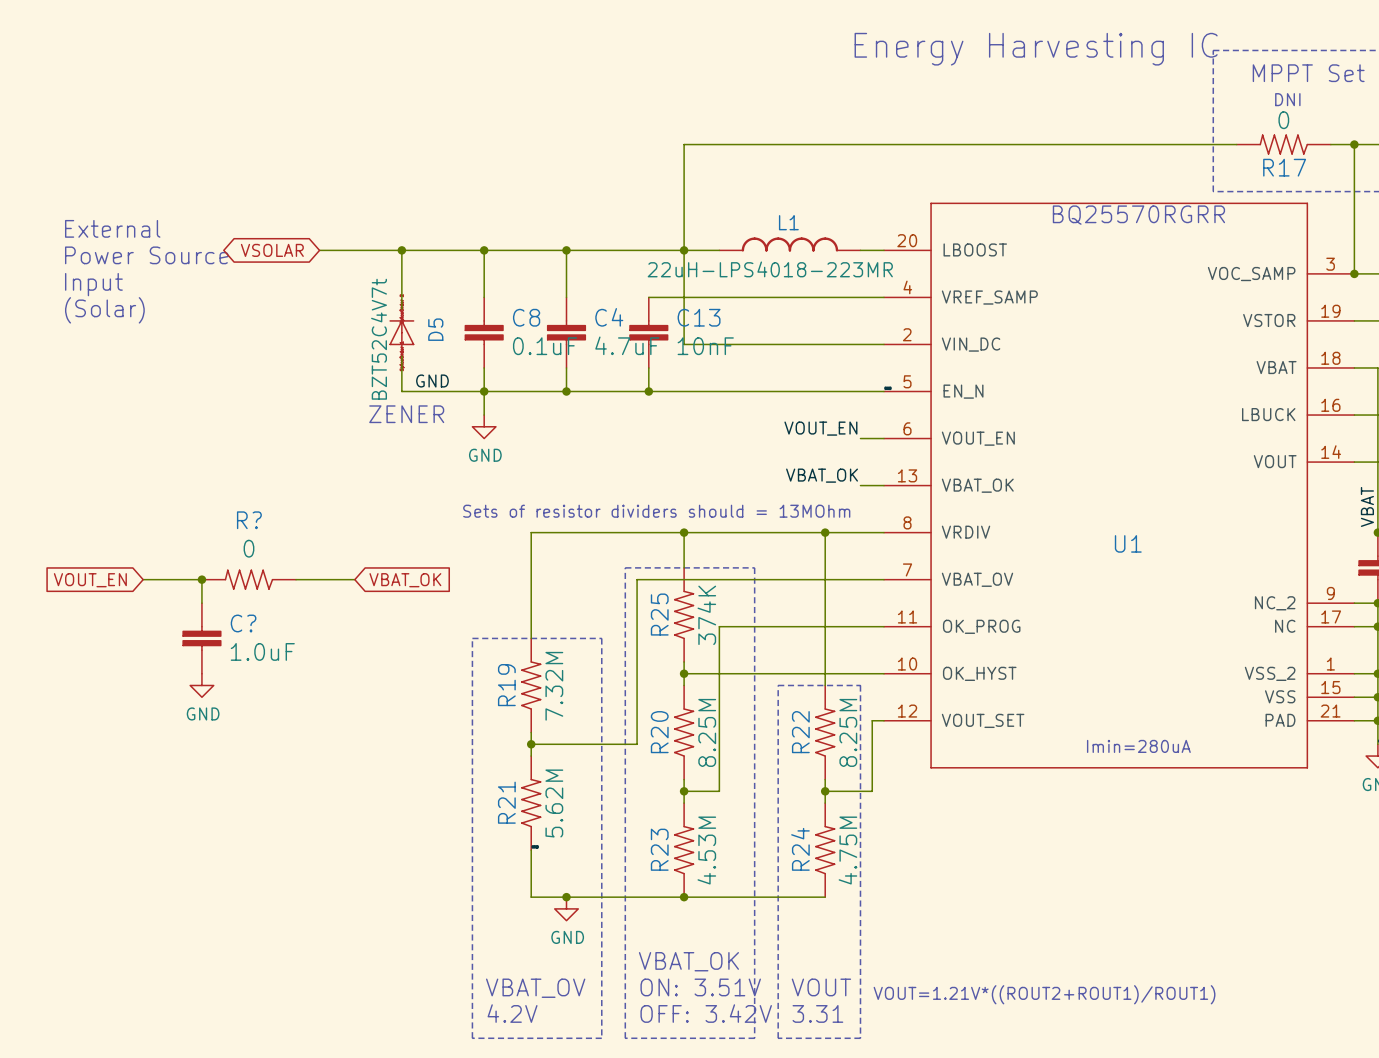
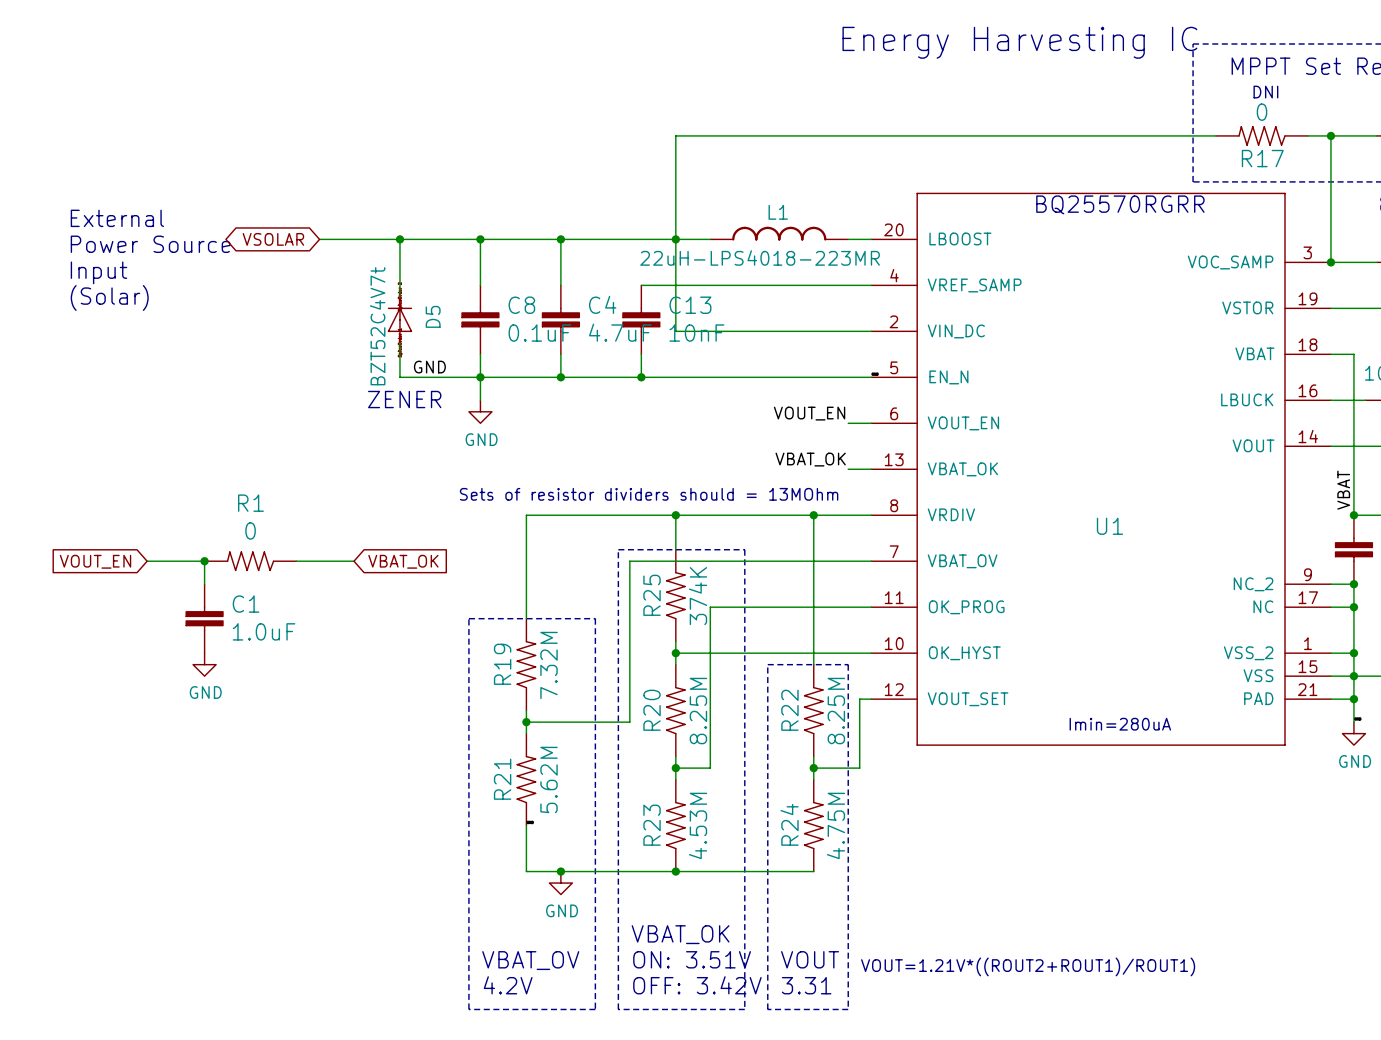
R? name: R? (249, 520) -> R1 (250, 503)
C? name: C? (243, 623) -> C1 (246, 604)

